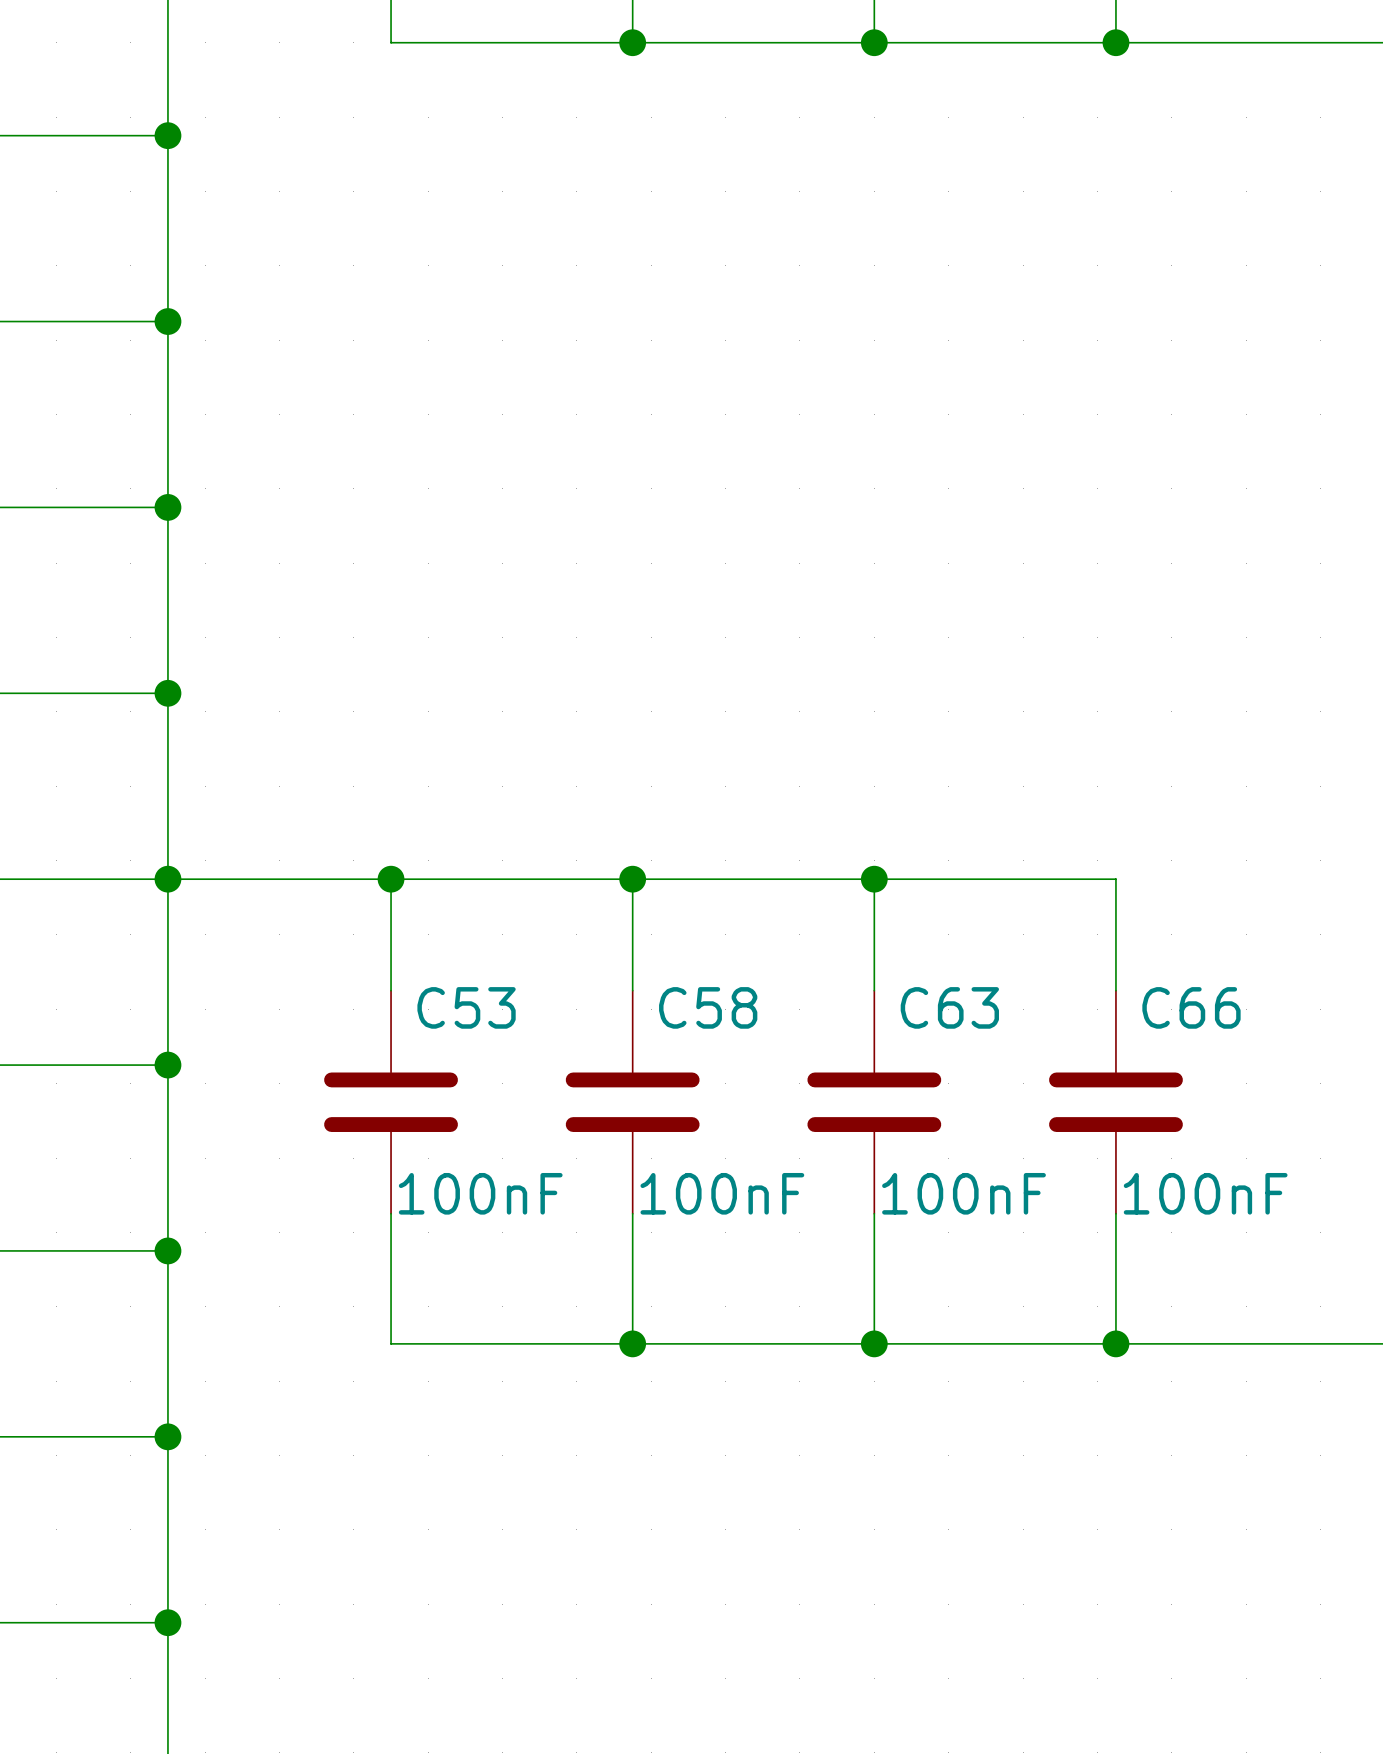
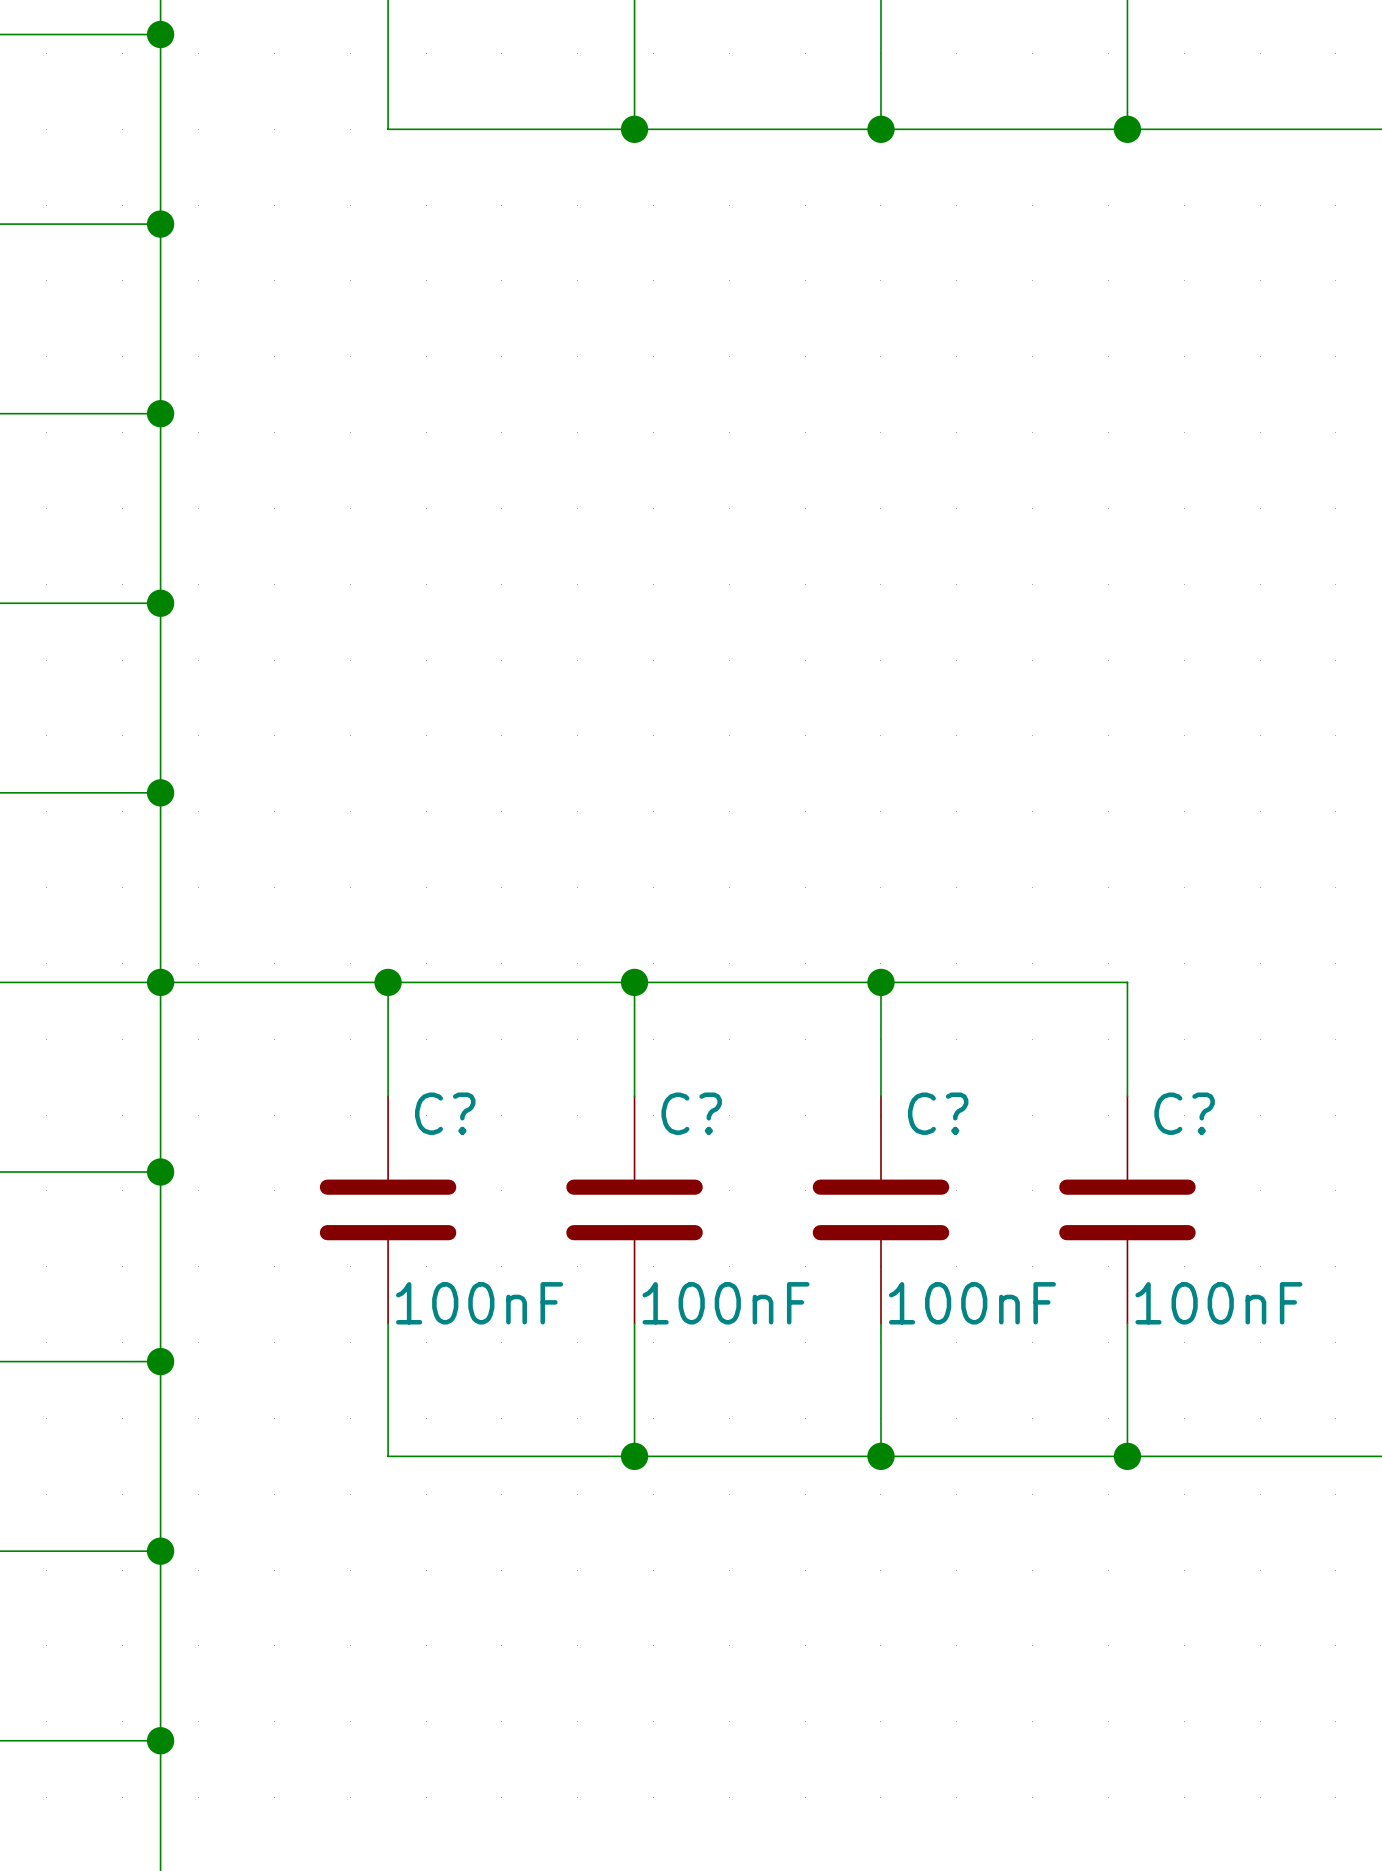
C53 name: C53 (466, 1007) -> C? (445, 1113)
C58 name: C58 (708, 1007) -> C? (691, 1113)
C63 name: C63 (949, 1007) -> C? (938, 1113)
C66 name: C66 (1191, 1007) -> C? (1184, 1113)

